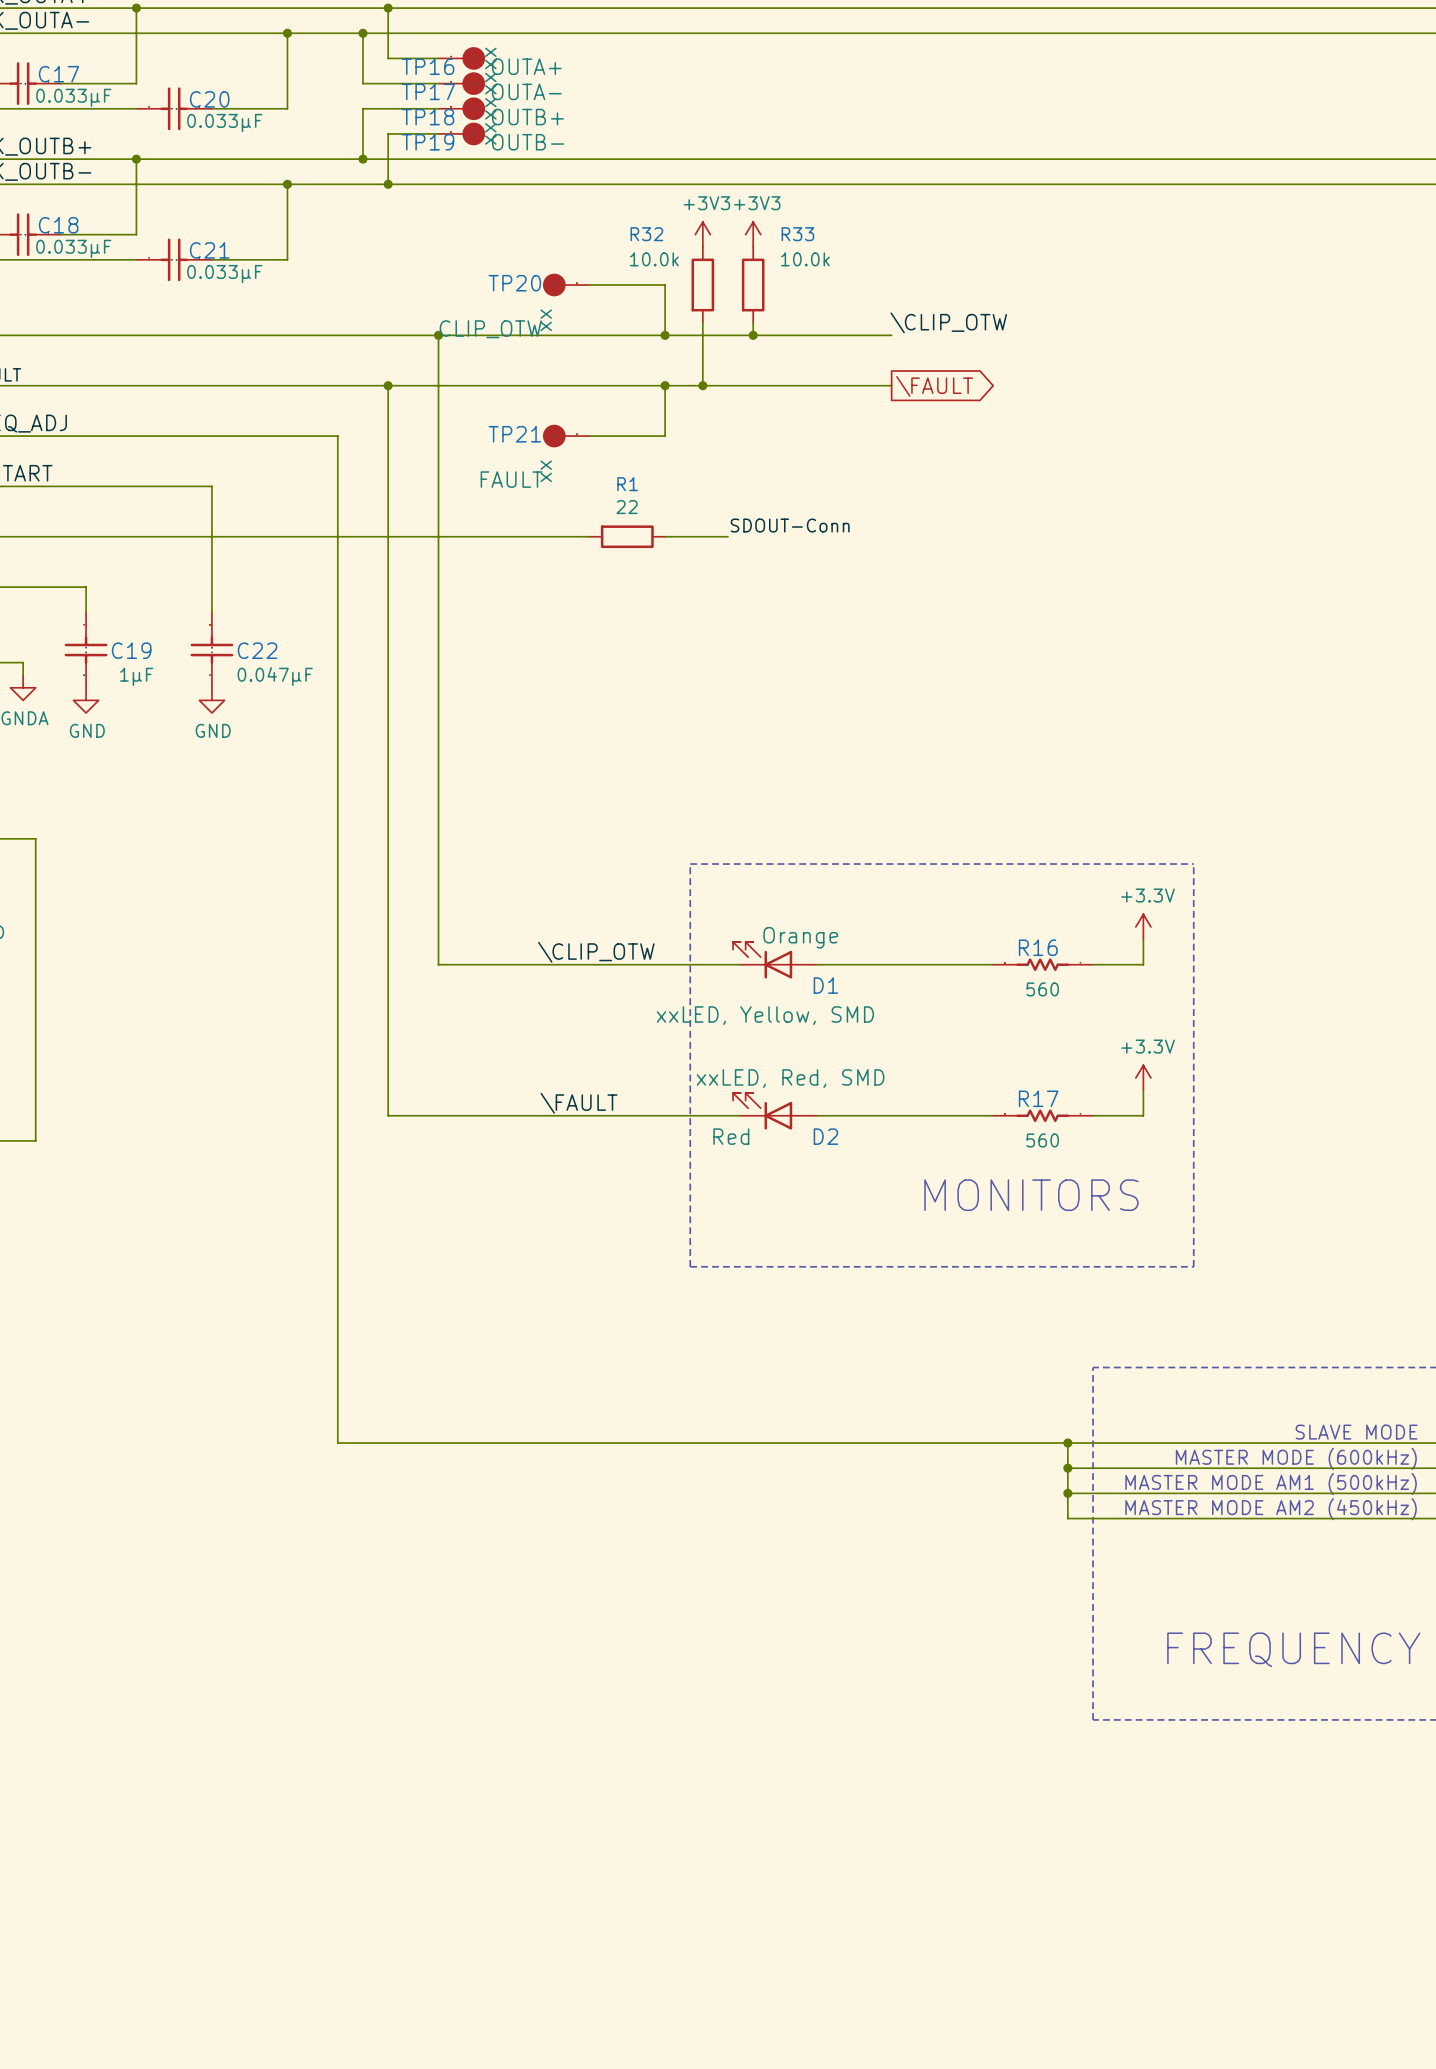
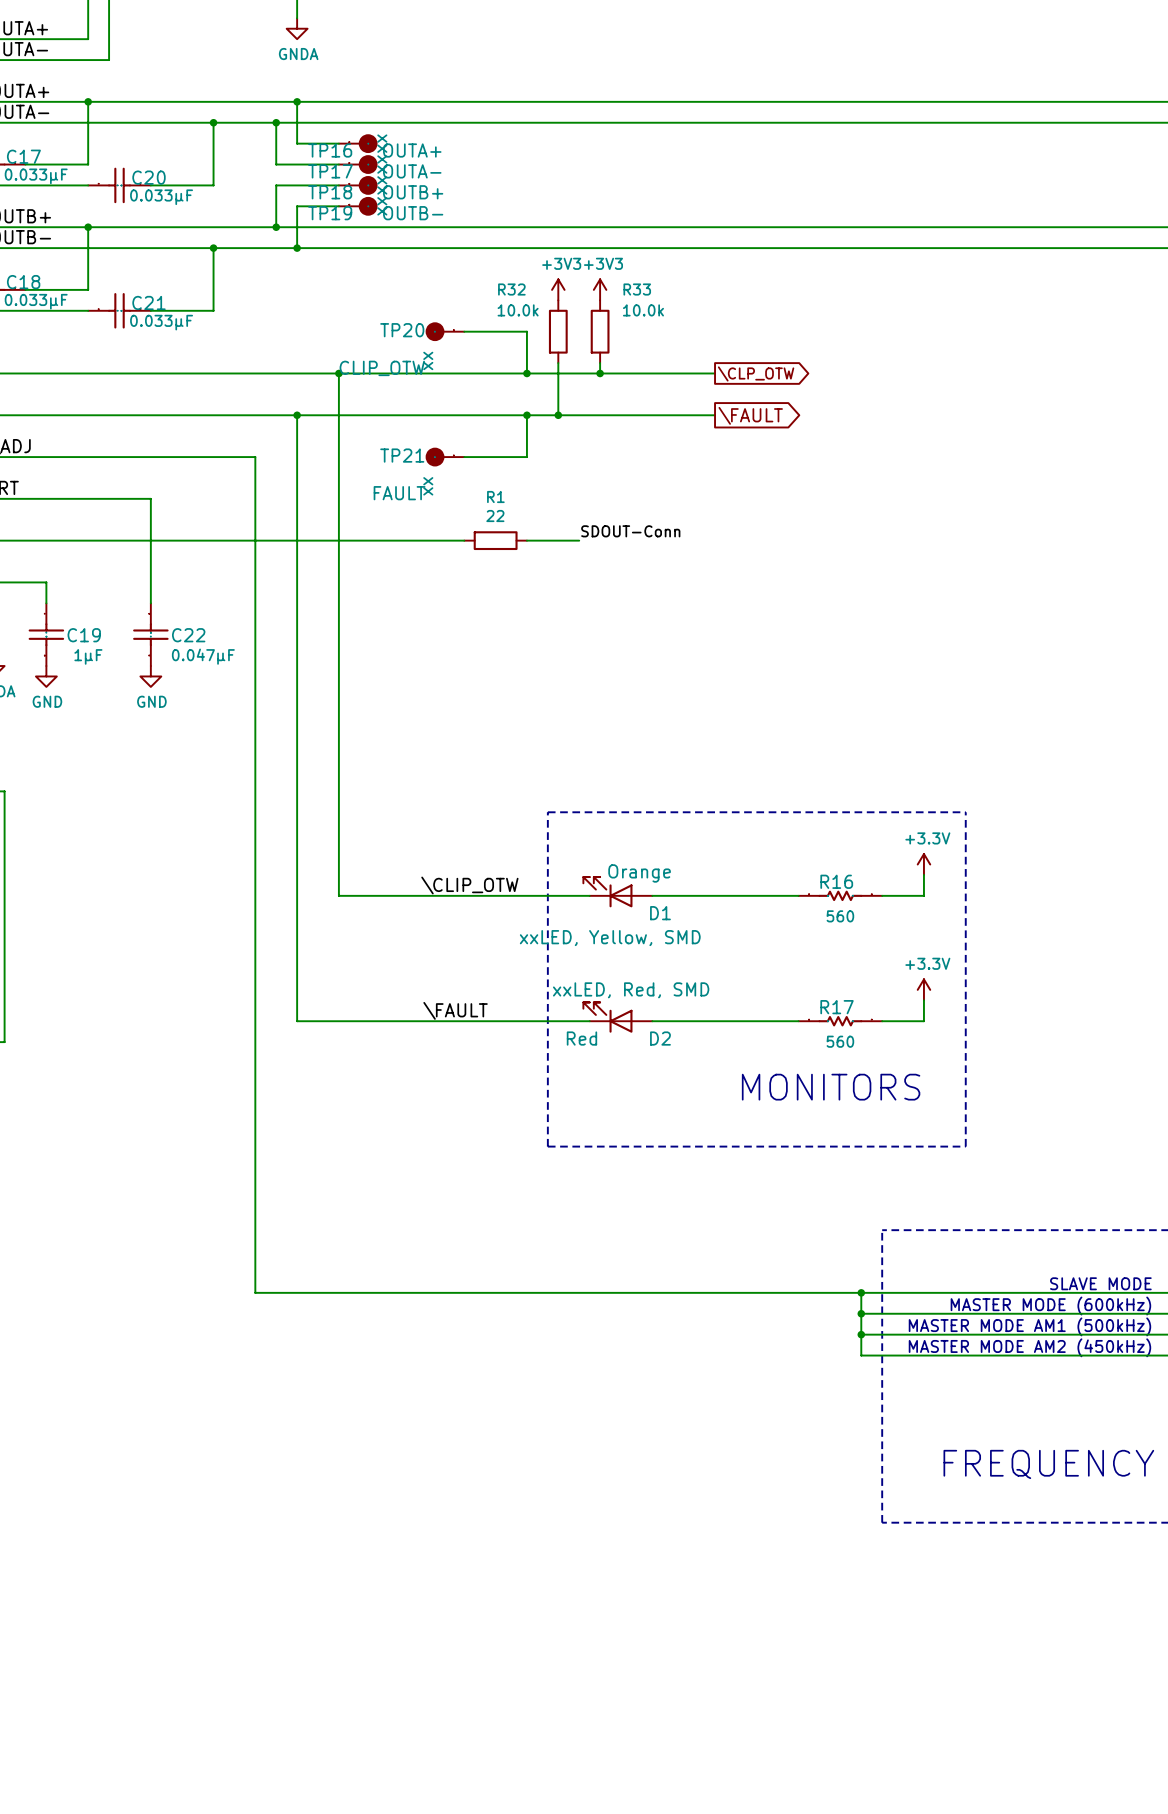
label: \CLIP_OTW (948, 322) -> none
global label: none -> \CLP_OTW (756, 373)

